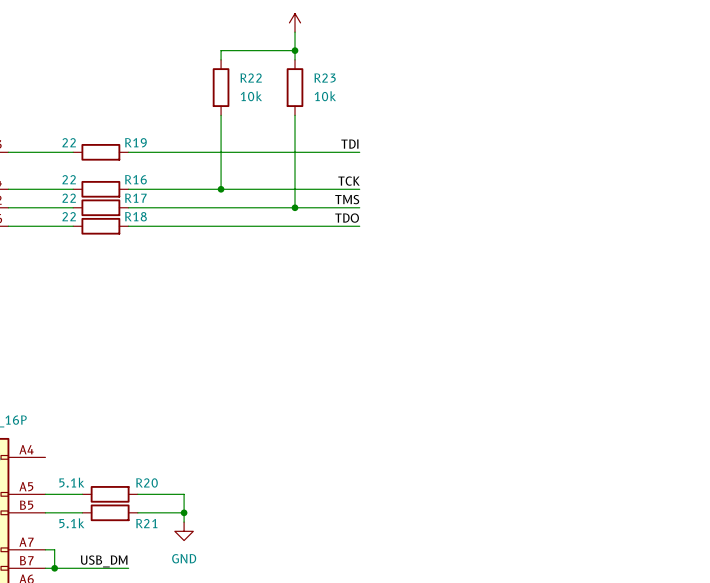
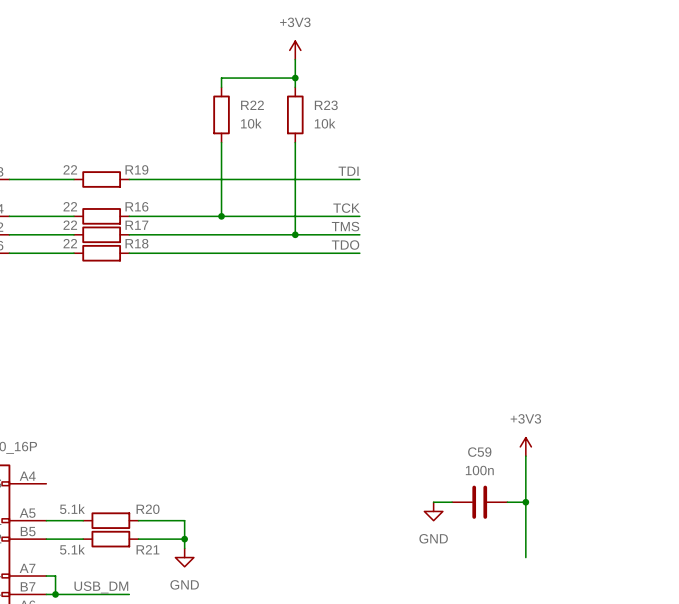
power symbol: none -> +3V3 (525, 446)
wire: none -> (525, 456) (525, 557)
wire: none -> (433, 502) (452, 502)
C59: none -> 100n (479, 502)
wire: none -> (507, 502) (525, 502)
junction: none -> (525, 502)
power symbol: none -> GND (433, 511)

